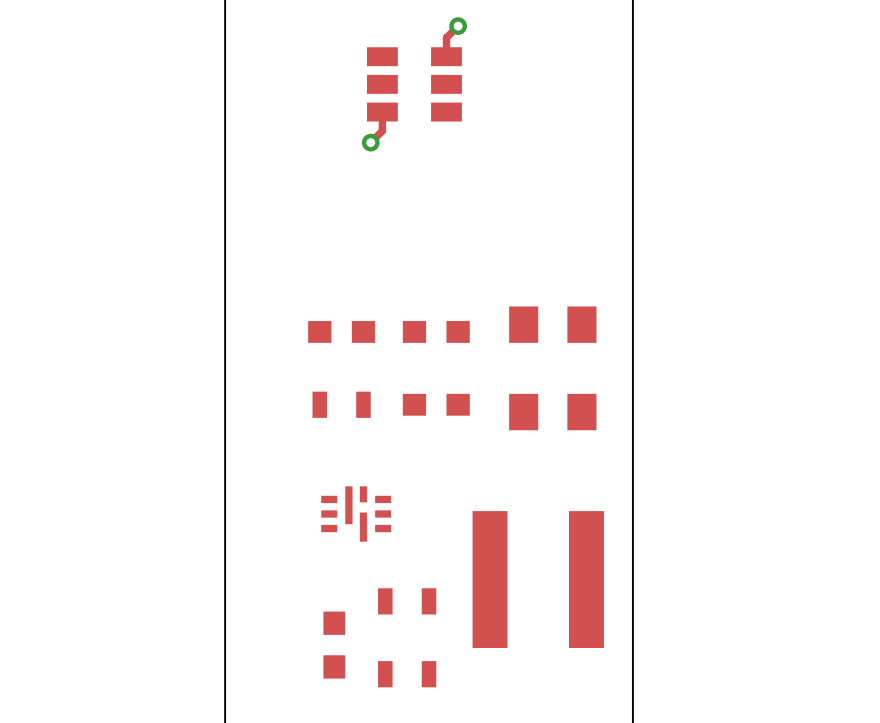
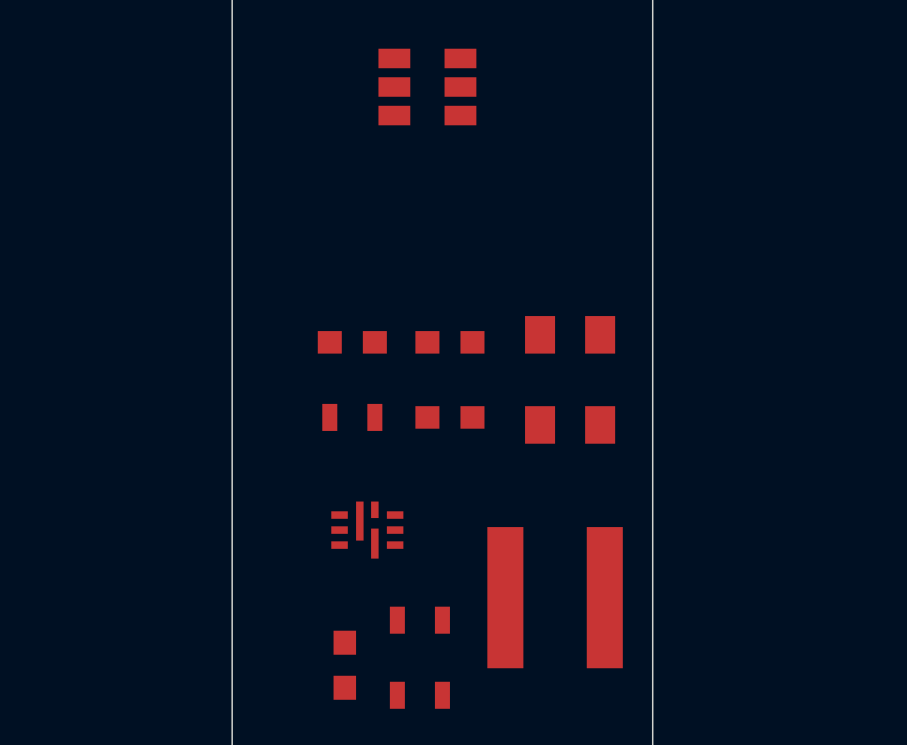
top track: (458, 26) (446, 37) (446, 56) -> none
via: (458, 26) -> none
top track: (382, 112) (382, 130) (370, 142) -> none
via: (370, 142) -> none

